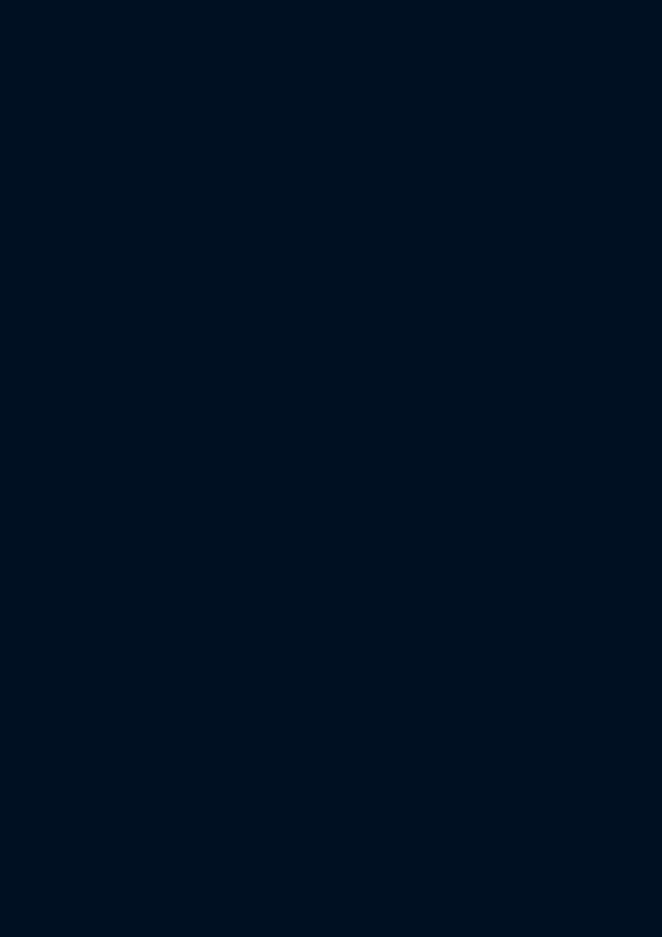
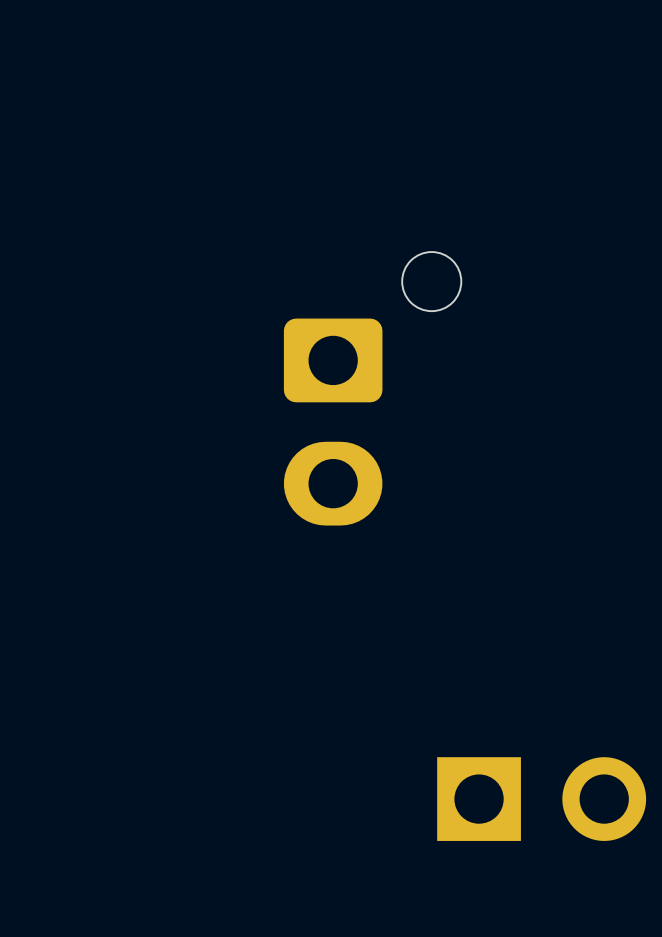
part: none -> (372, 388)
part: none -> (541, 799)

